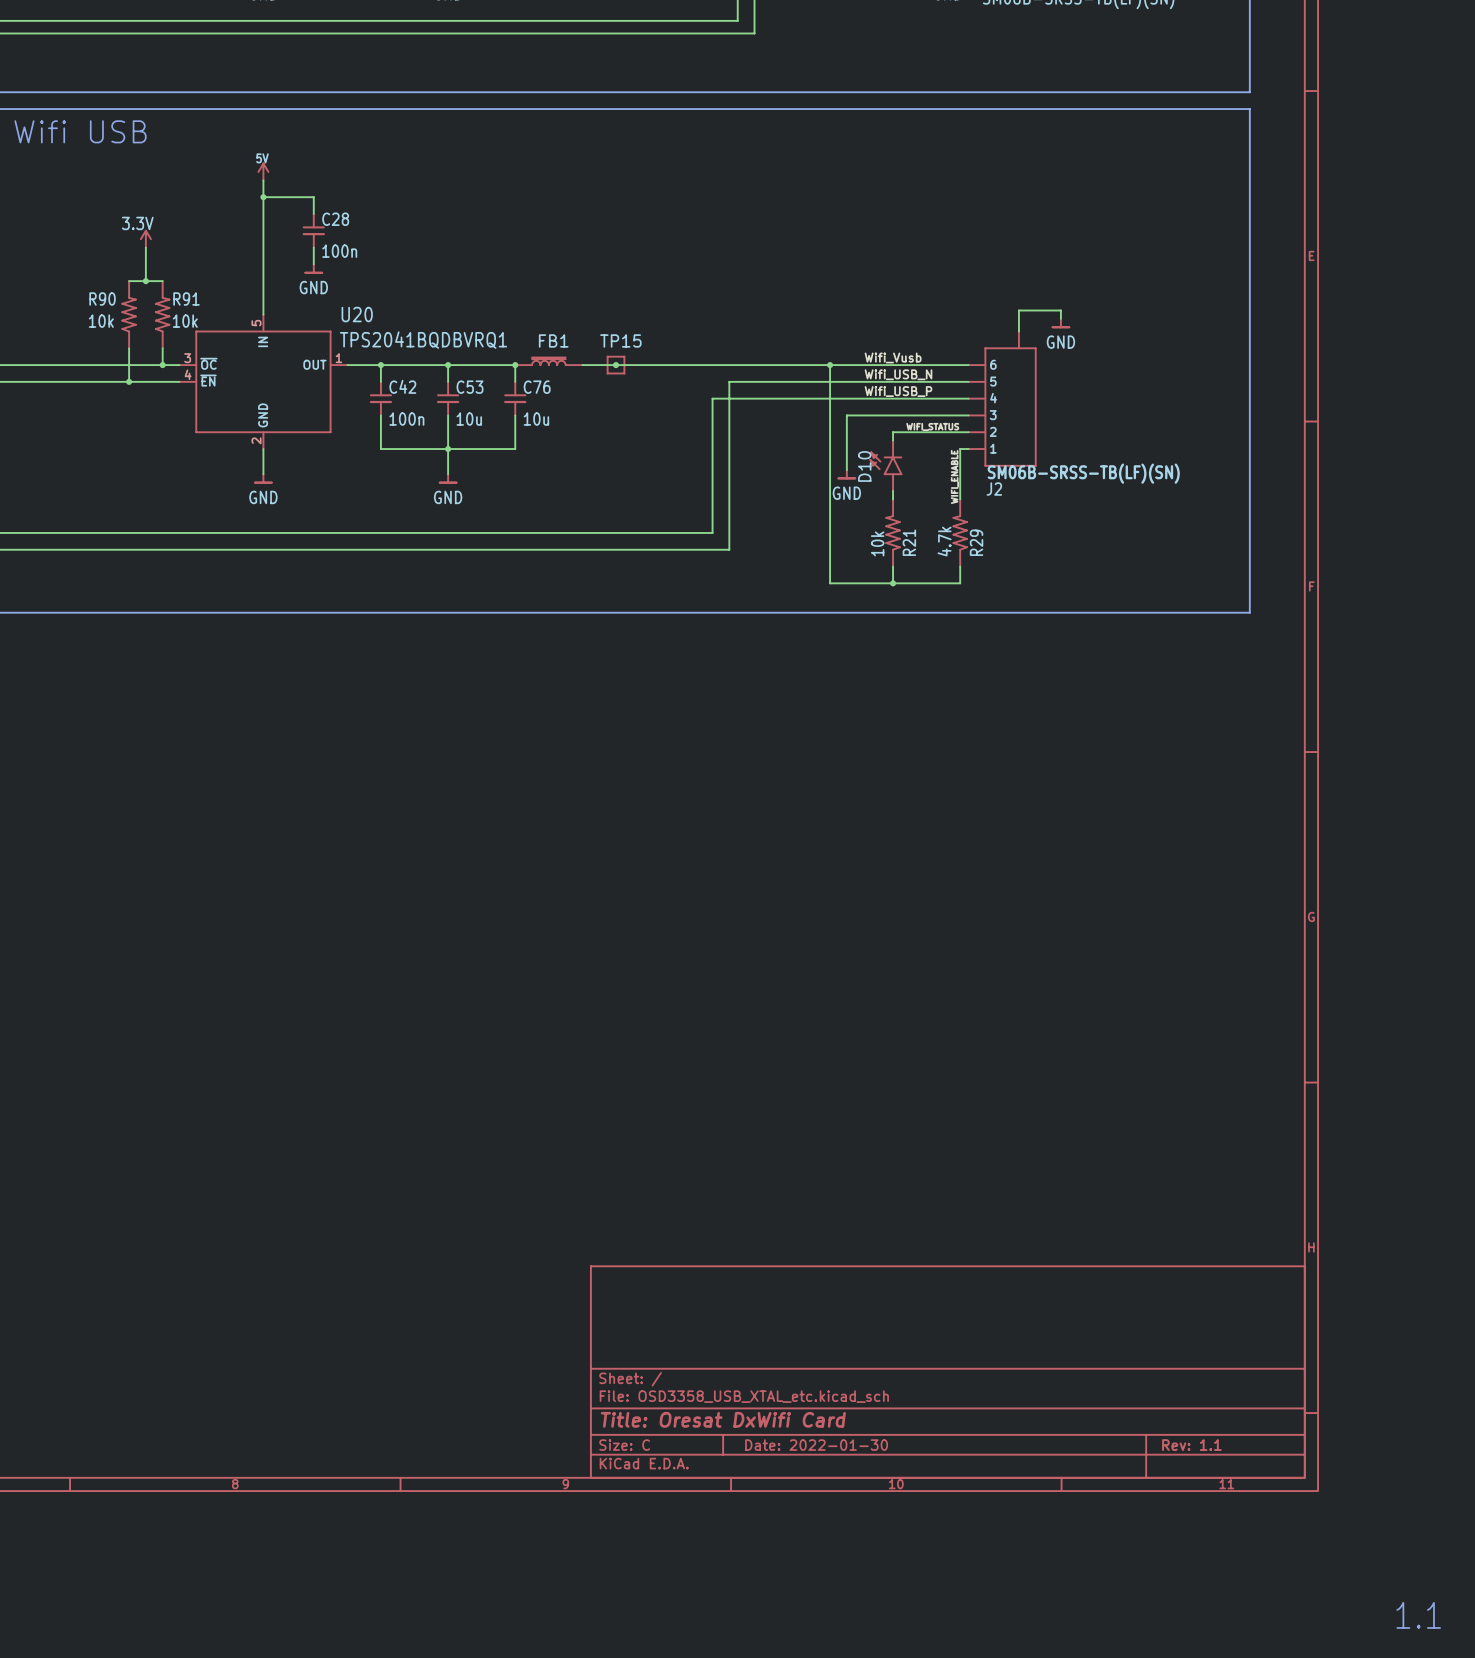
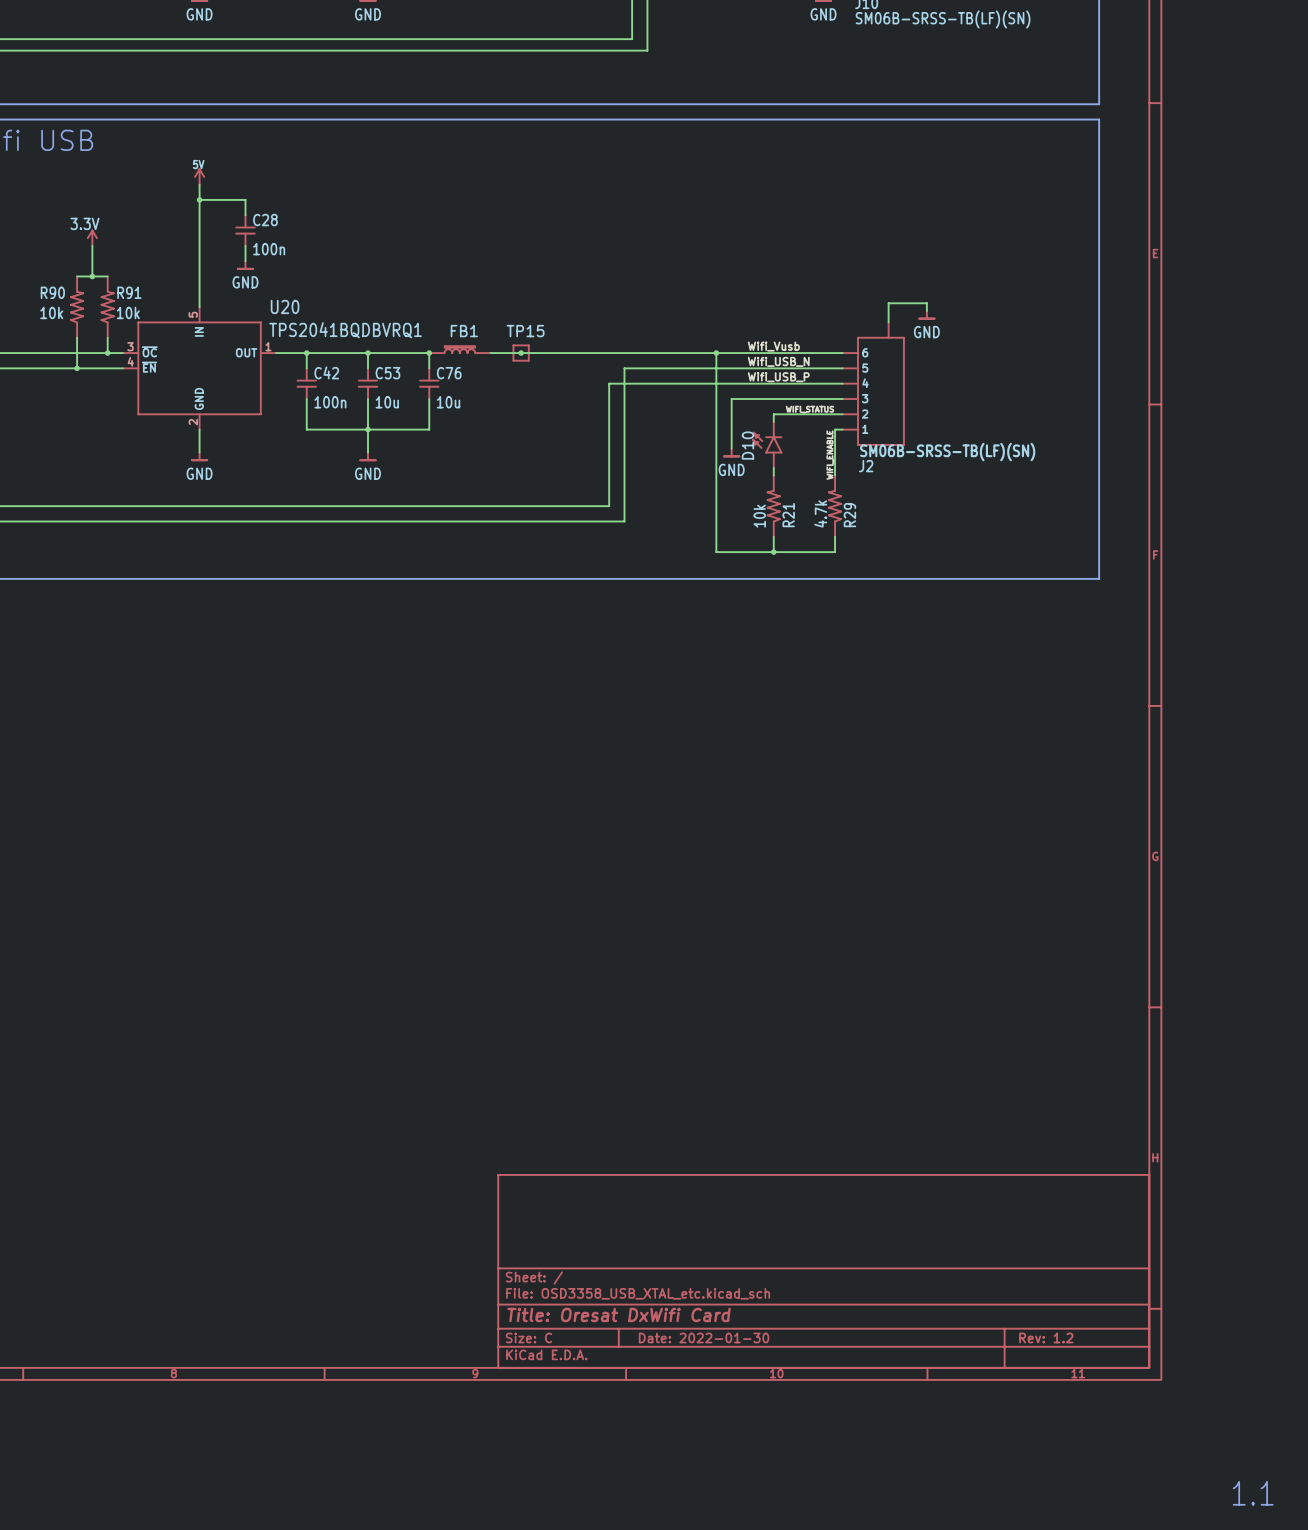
title block: Rev: 1.1 (1191, 1445) -> Rev: 1.2 (1046, 1337)

